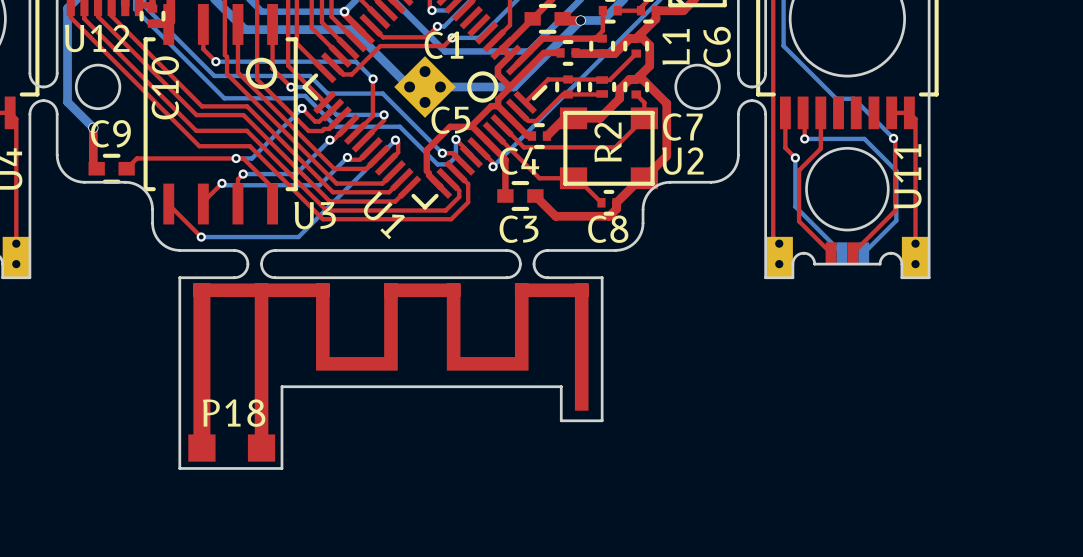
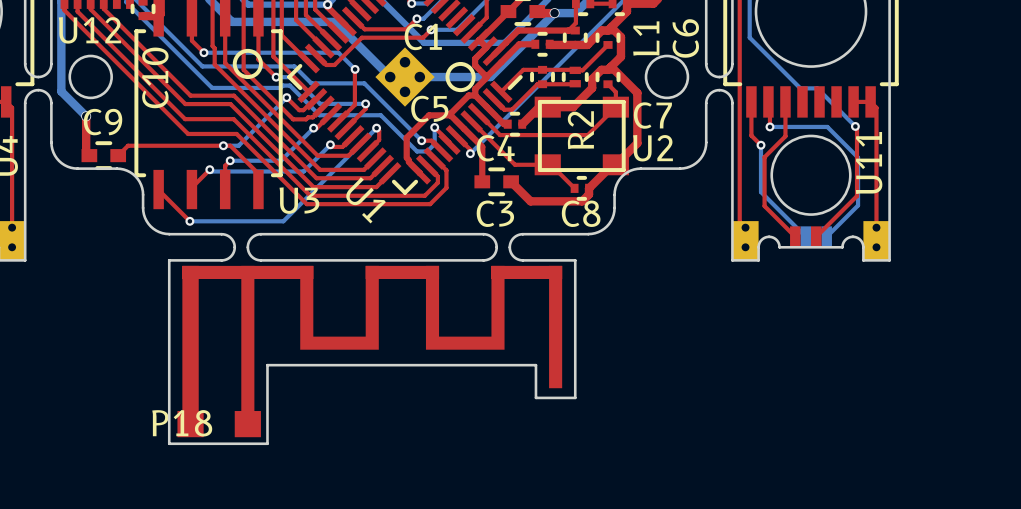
P18 name position: P18 (234, 413) -> P18 (182, 423)

